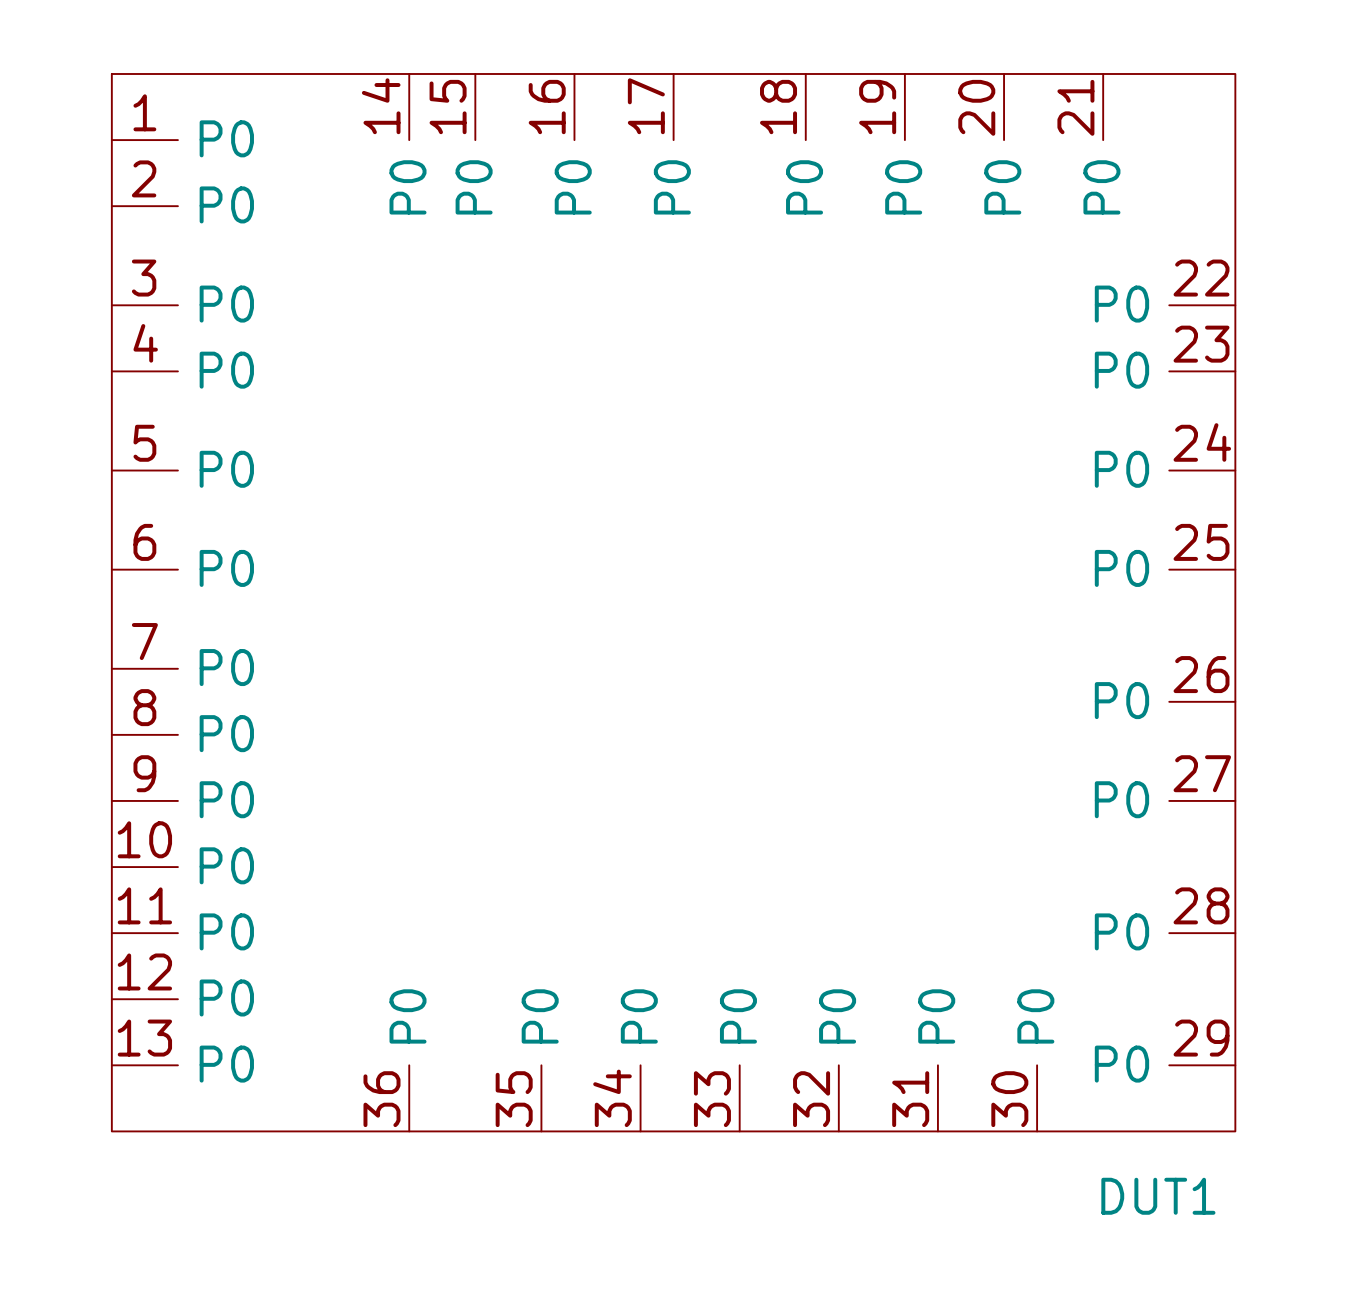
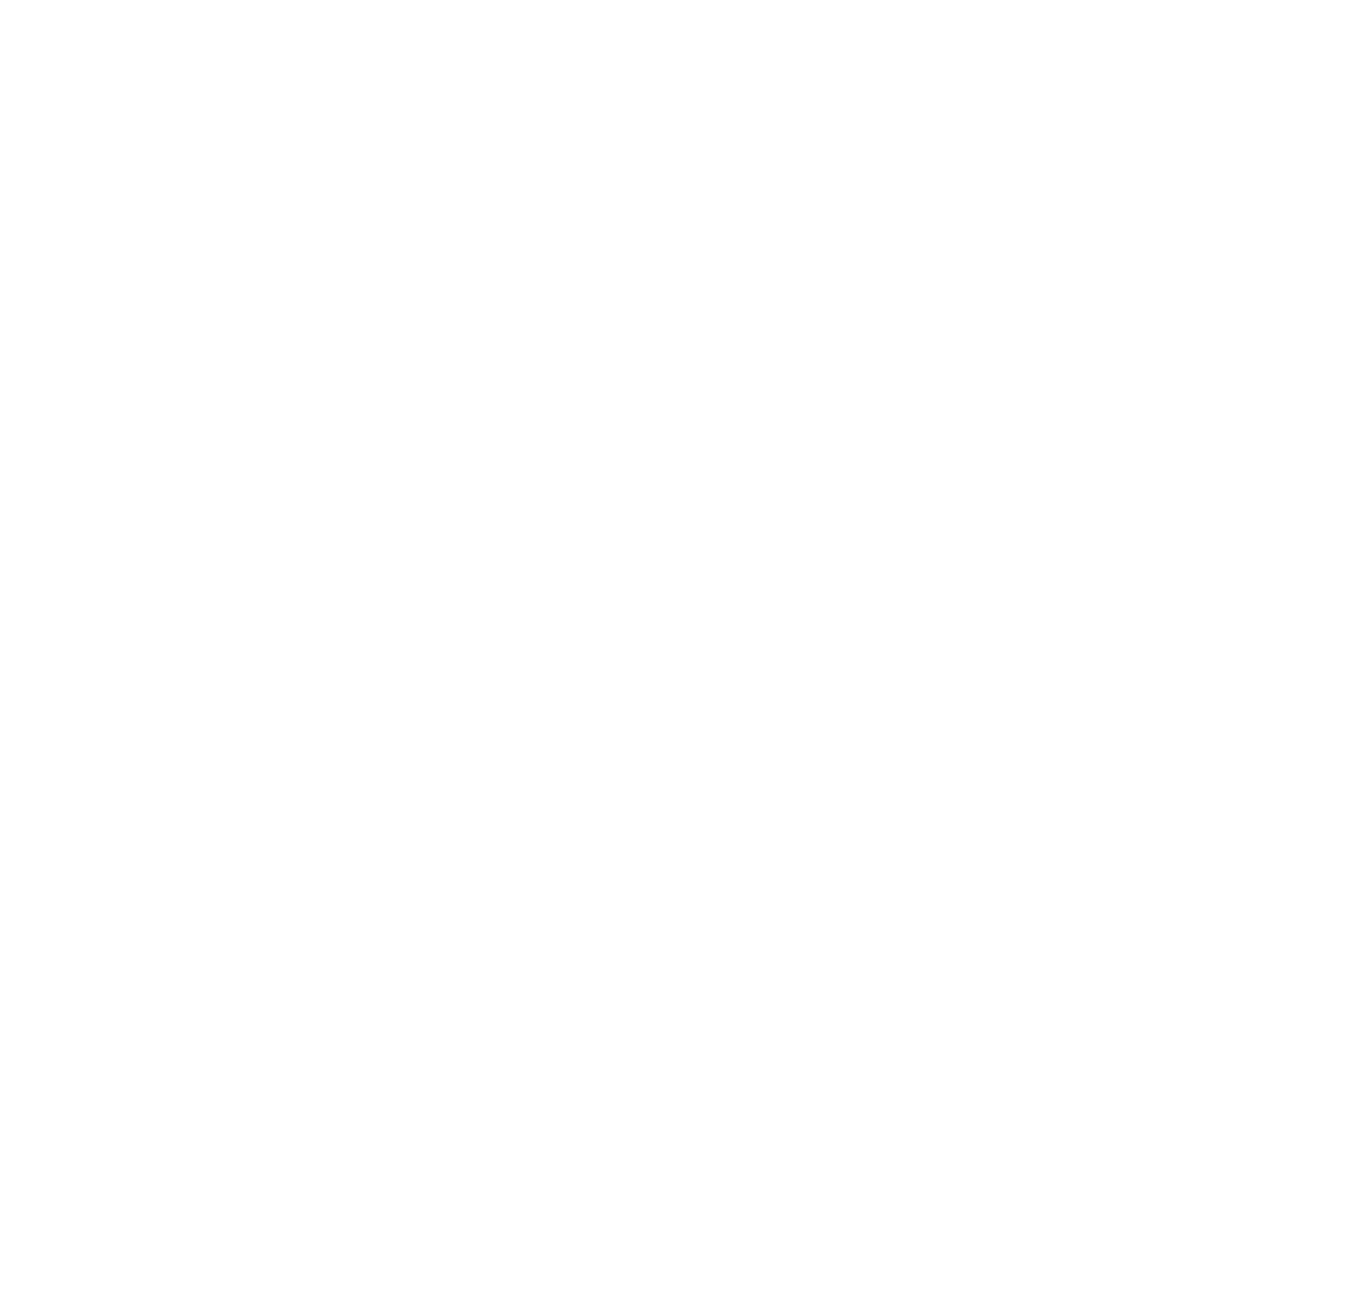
DUT1: (673, 602) -> none

